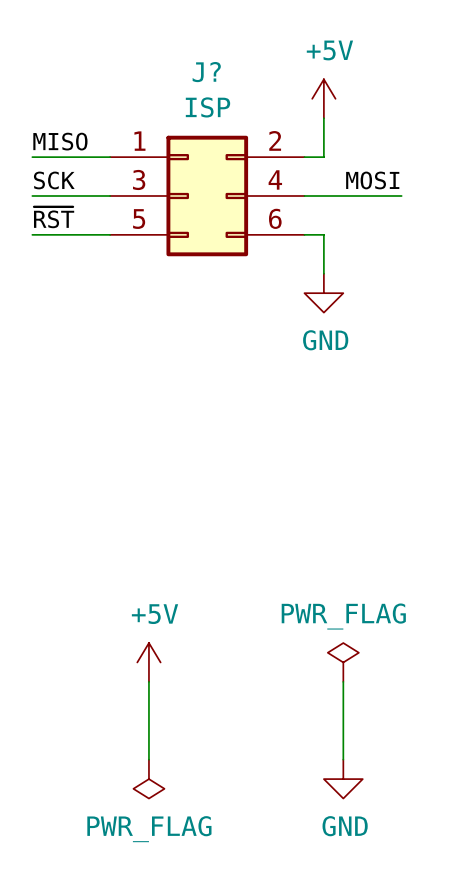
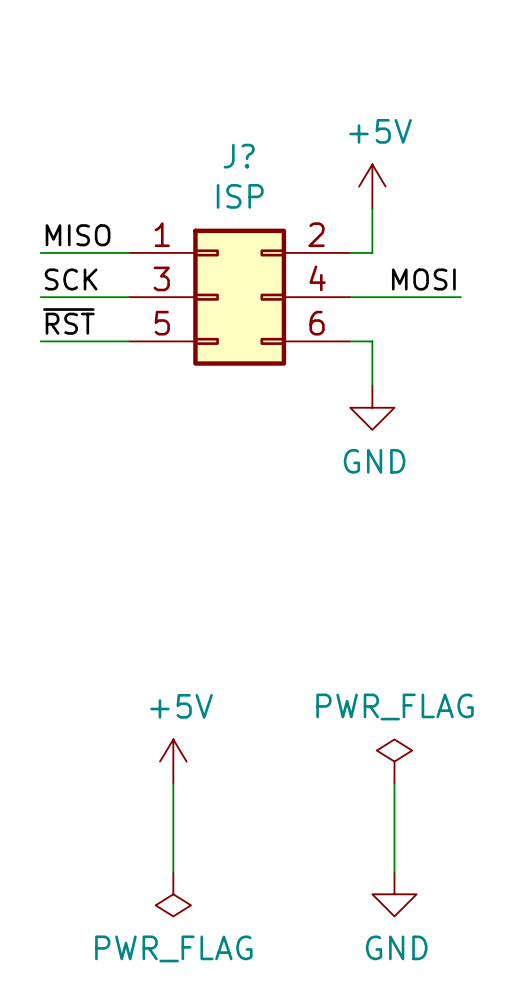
power symbol position: +5V (323, 98) -> +5V (372, 186)
wire: (323, 118) (323, 157) (304, 157) -> (372, 208) (372, 252) (350, 252)
label position: MISO (60, 141) -> MISO (78, 235)
wire: (32, 157) (110, 157) -> (40, 252) (129, 252)
label position: SCK (54, 180) -> SCK (71, 279)
label position: MOSI (372, 180) -> MOSI (423, 279)
wire: (32, 195) (110, 195) -> (40, 297) (129, 297)
J? position: (207, 195) -> (239, 297)
wire: (304, 195) (401, 195) -> (350, 297) (460, 297)
label position: ~{RST} (54, 217) -> ~{RST} (68, 321)
wire: (32, 234) (110, 234) -> (40, 341) (129, 341)
wire: (304, 234) (323, 234) (323, 273) -> (350, 341) (372, 341) (372, 385)
power symbol position: GND (323, 293) -> GND (372, 407)

